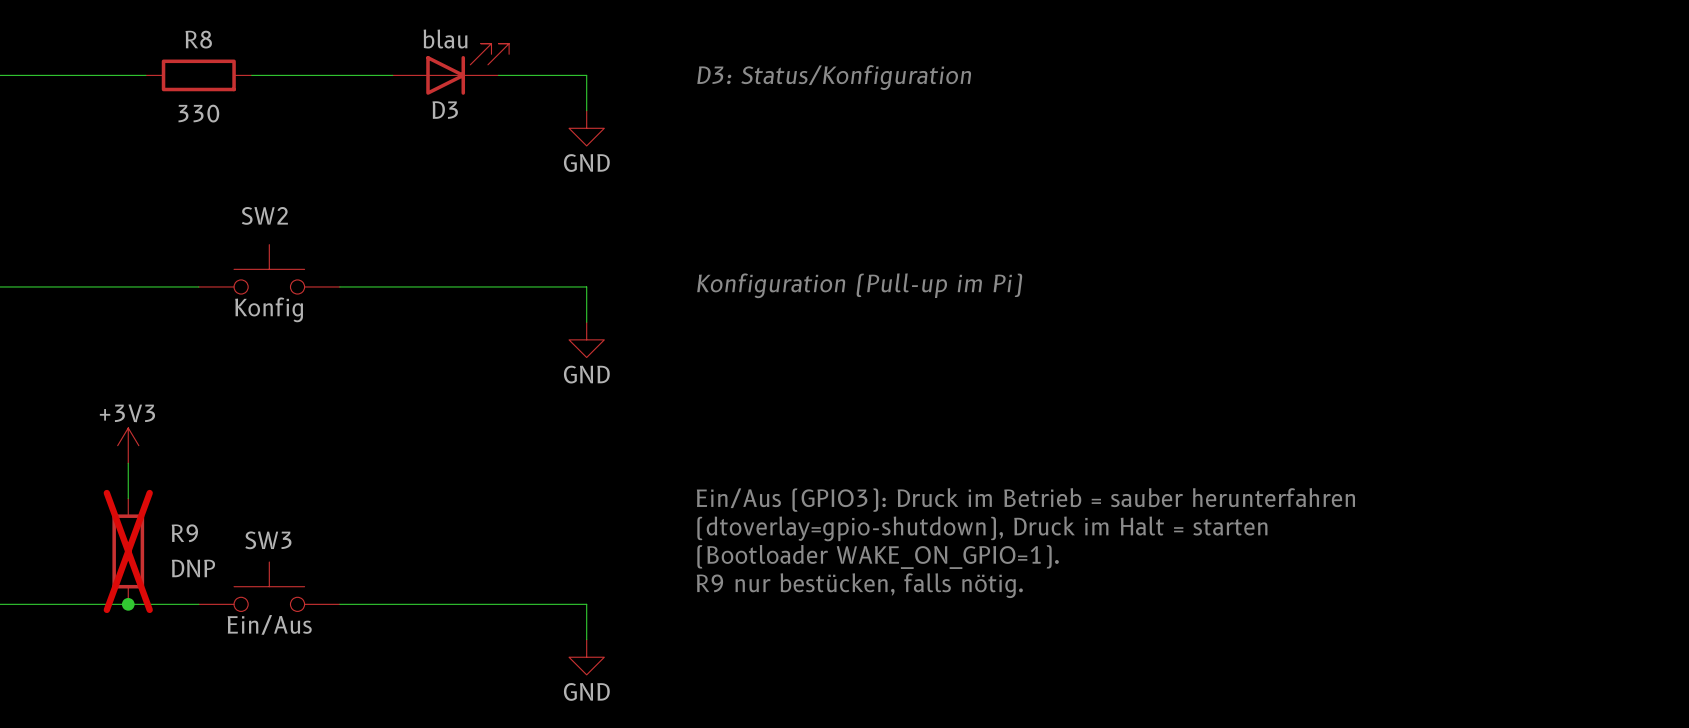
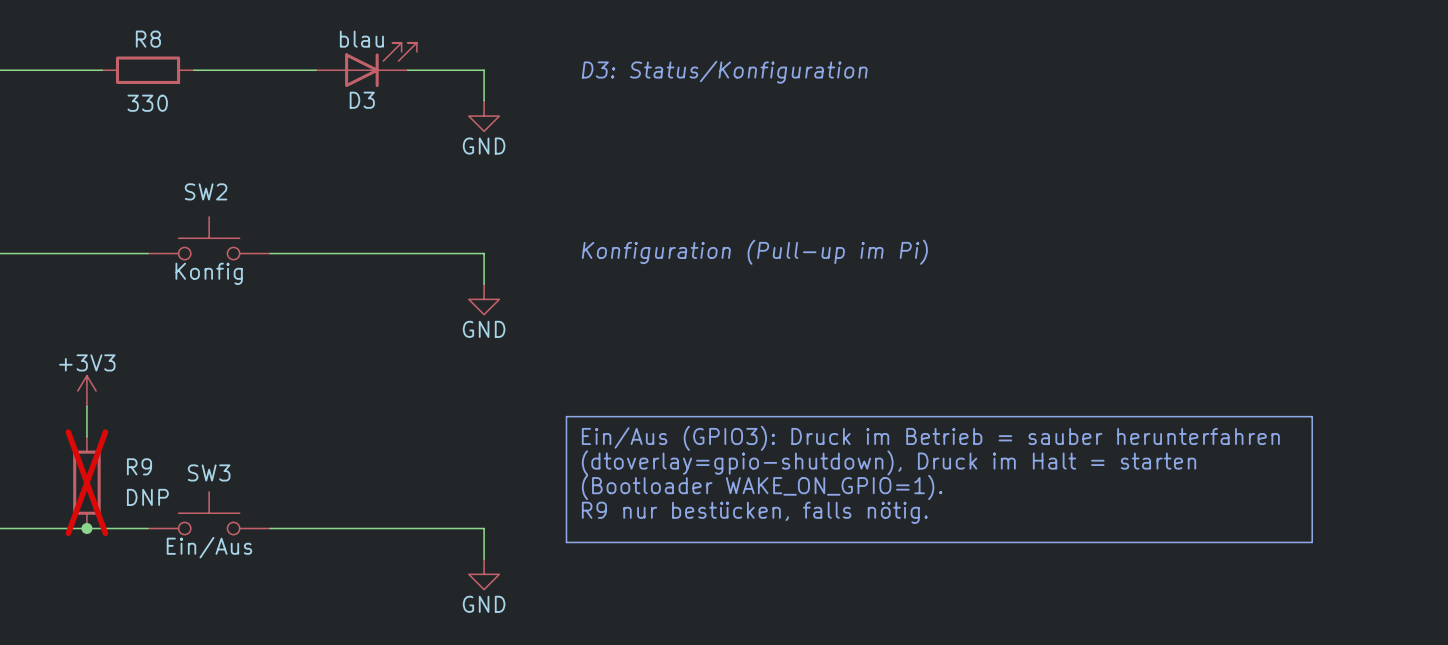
line: none -> (566, 416) (1312, 416) (1312, 542) (566, 542) (566, 416)

